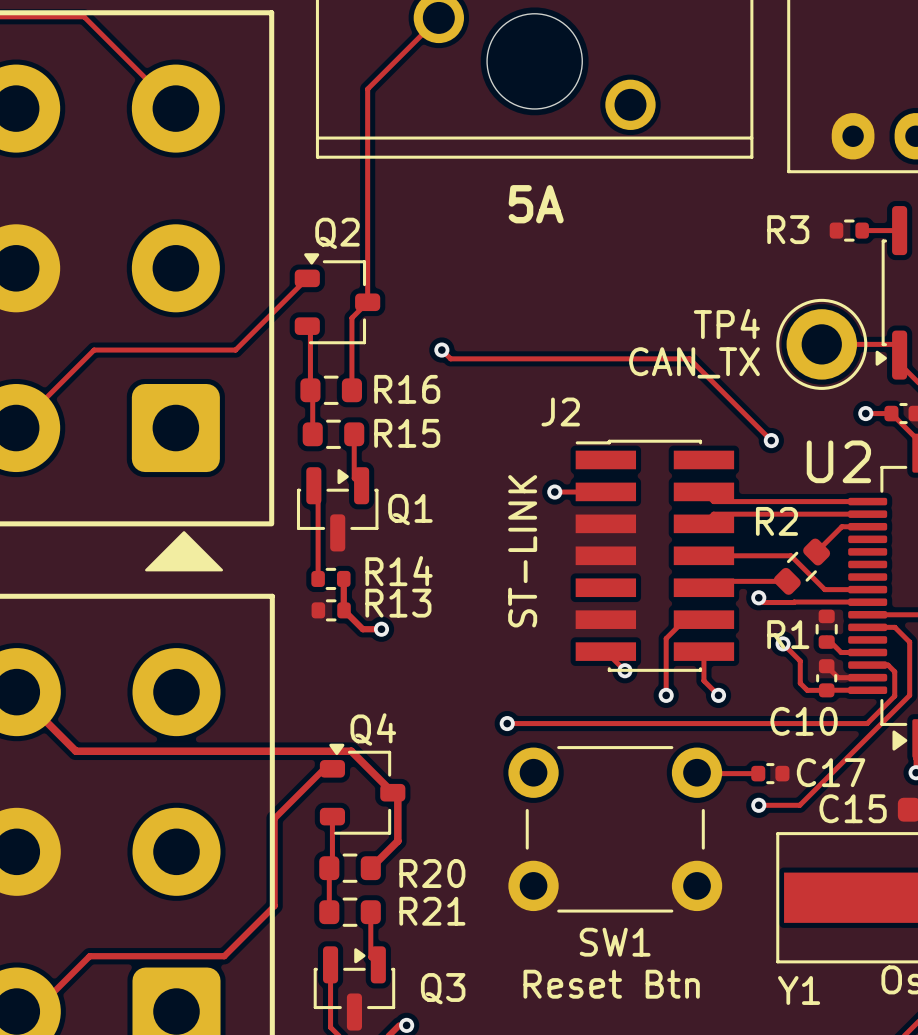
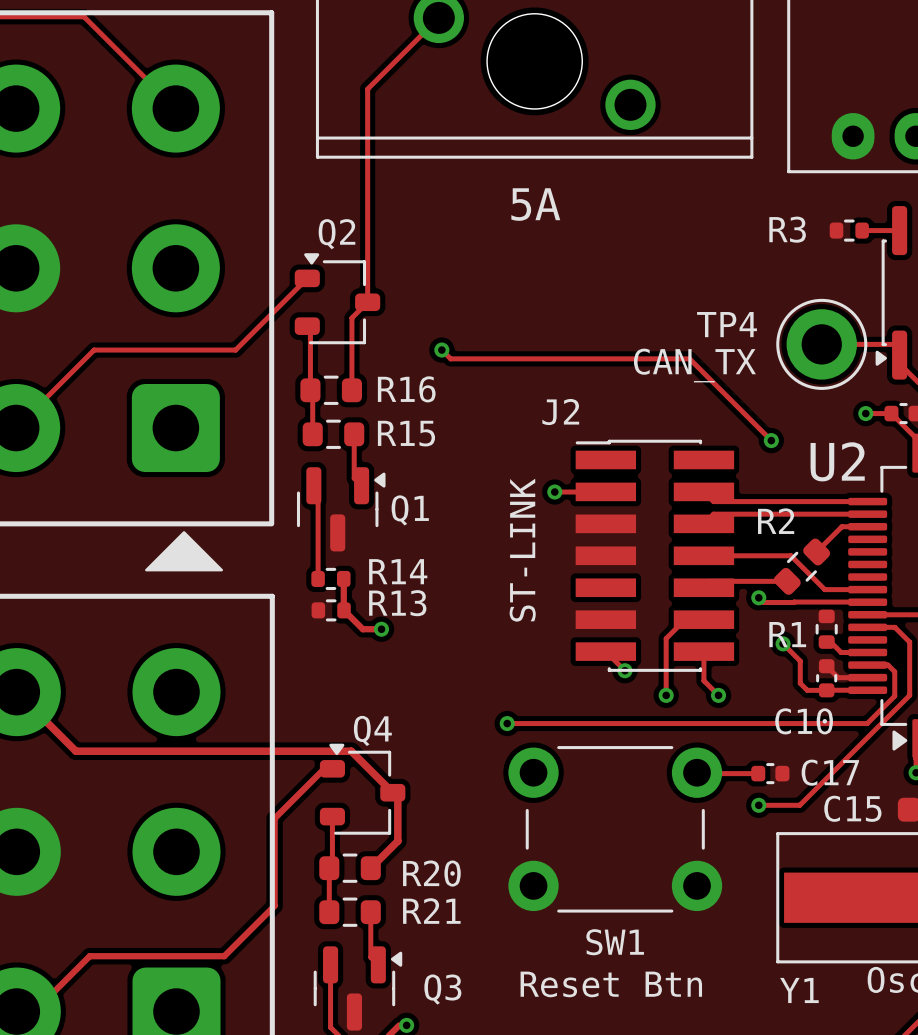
Q1 footprint: [296, 467, 379, 552] -> [296, 467, 386, 552]
Q3 footprint: [313, 946, 396, 1031] -> [313, 946, 403, 1031]

